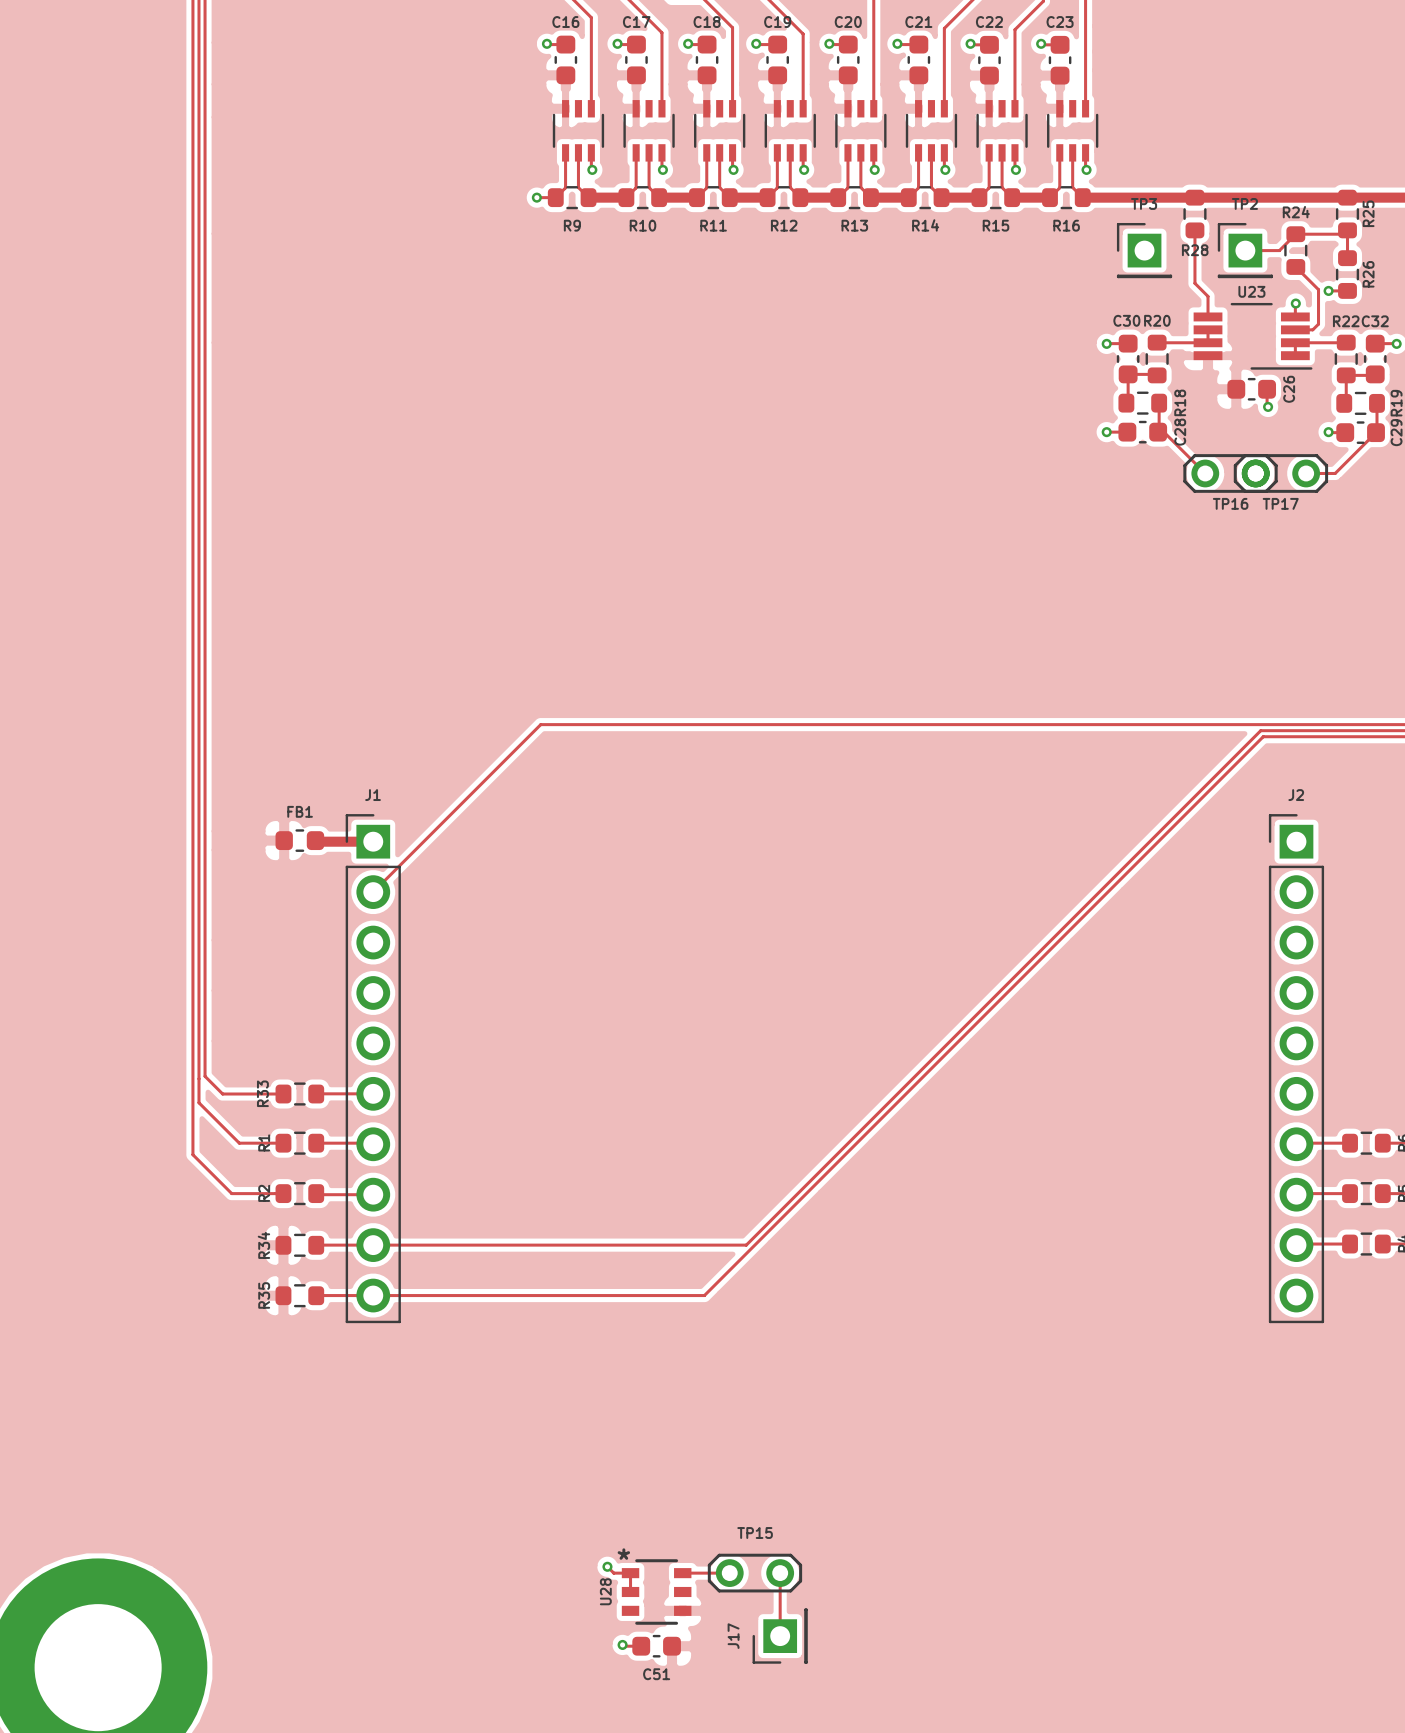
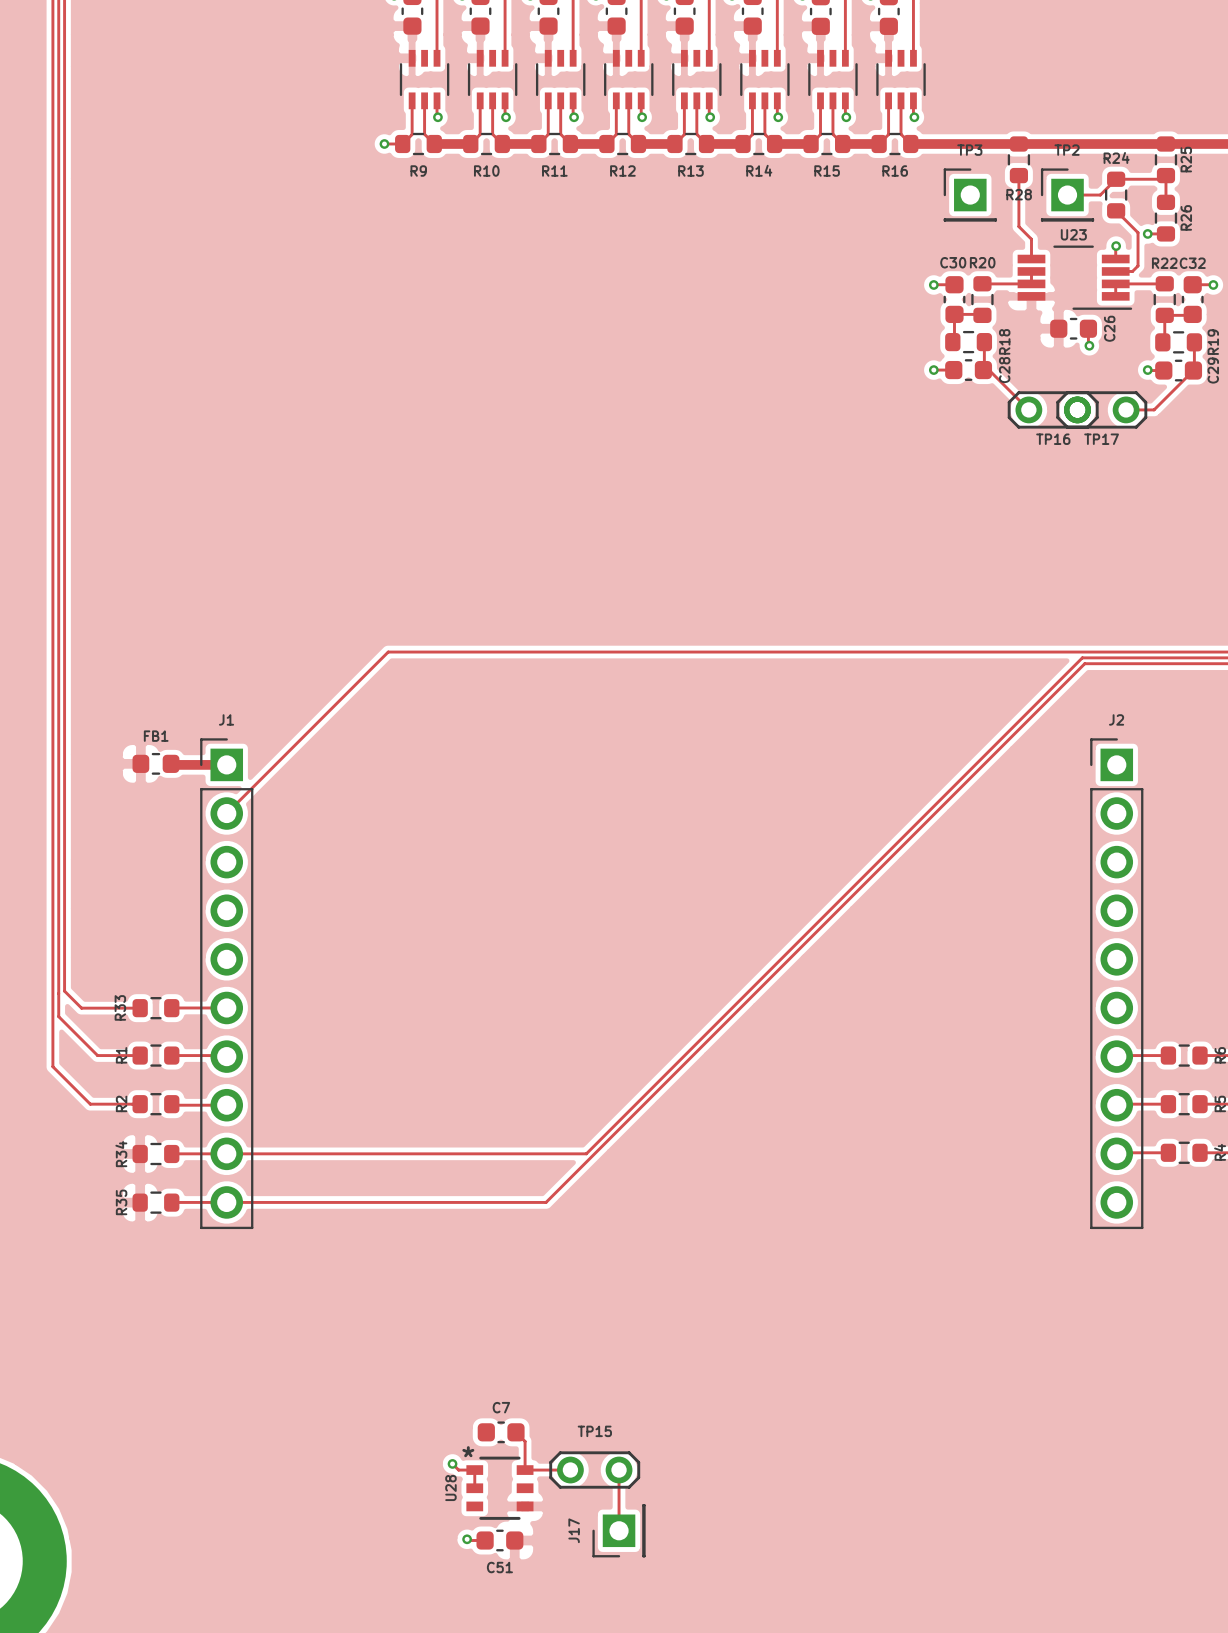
C7: none -> (501, 1432)
track: none -> (515, 1432) (525, 1441) (525, 1470)

